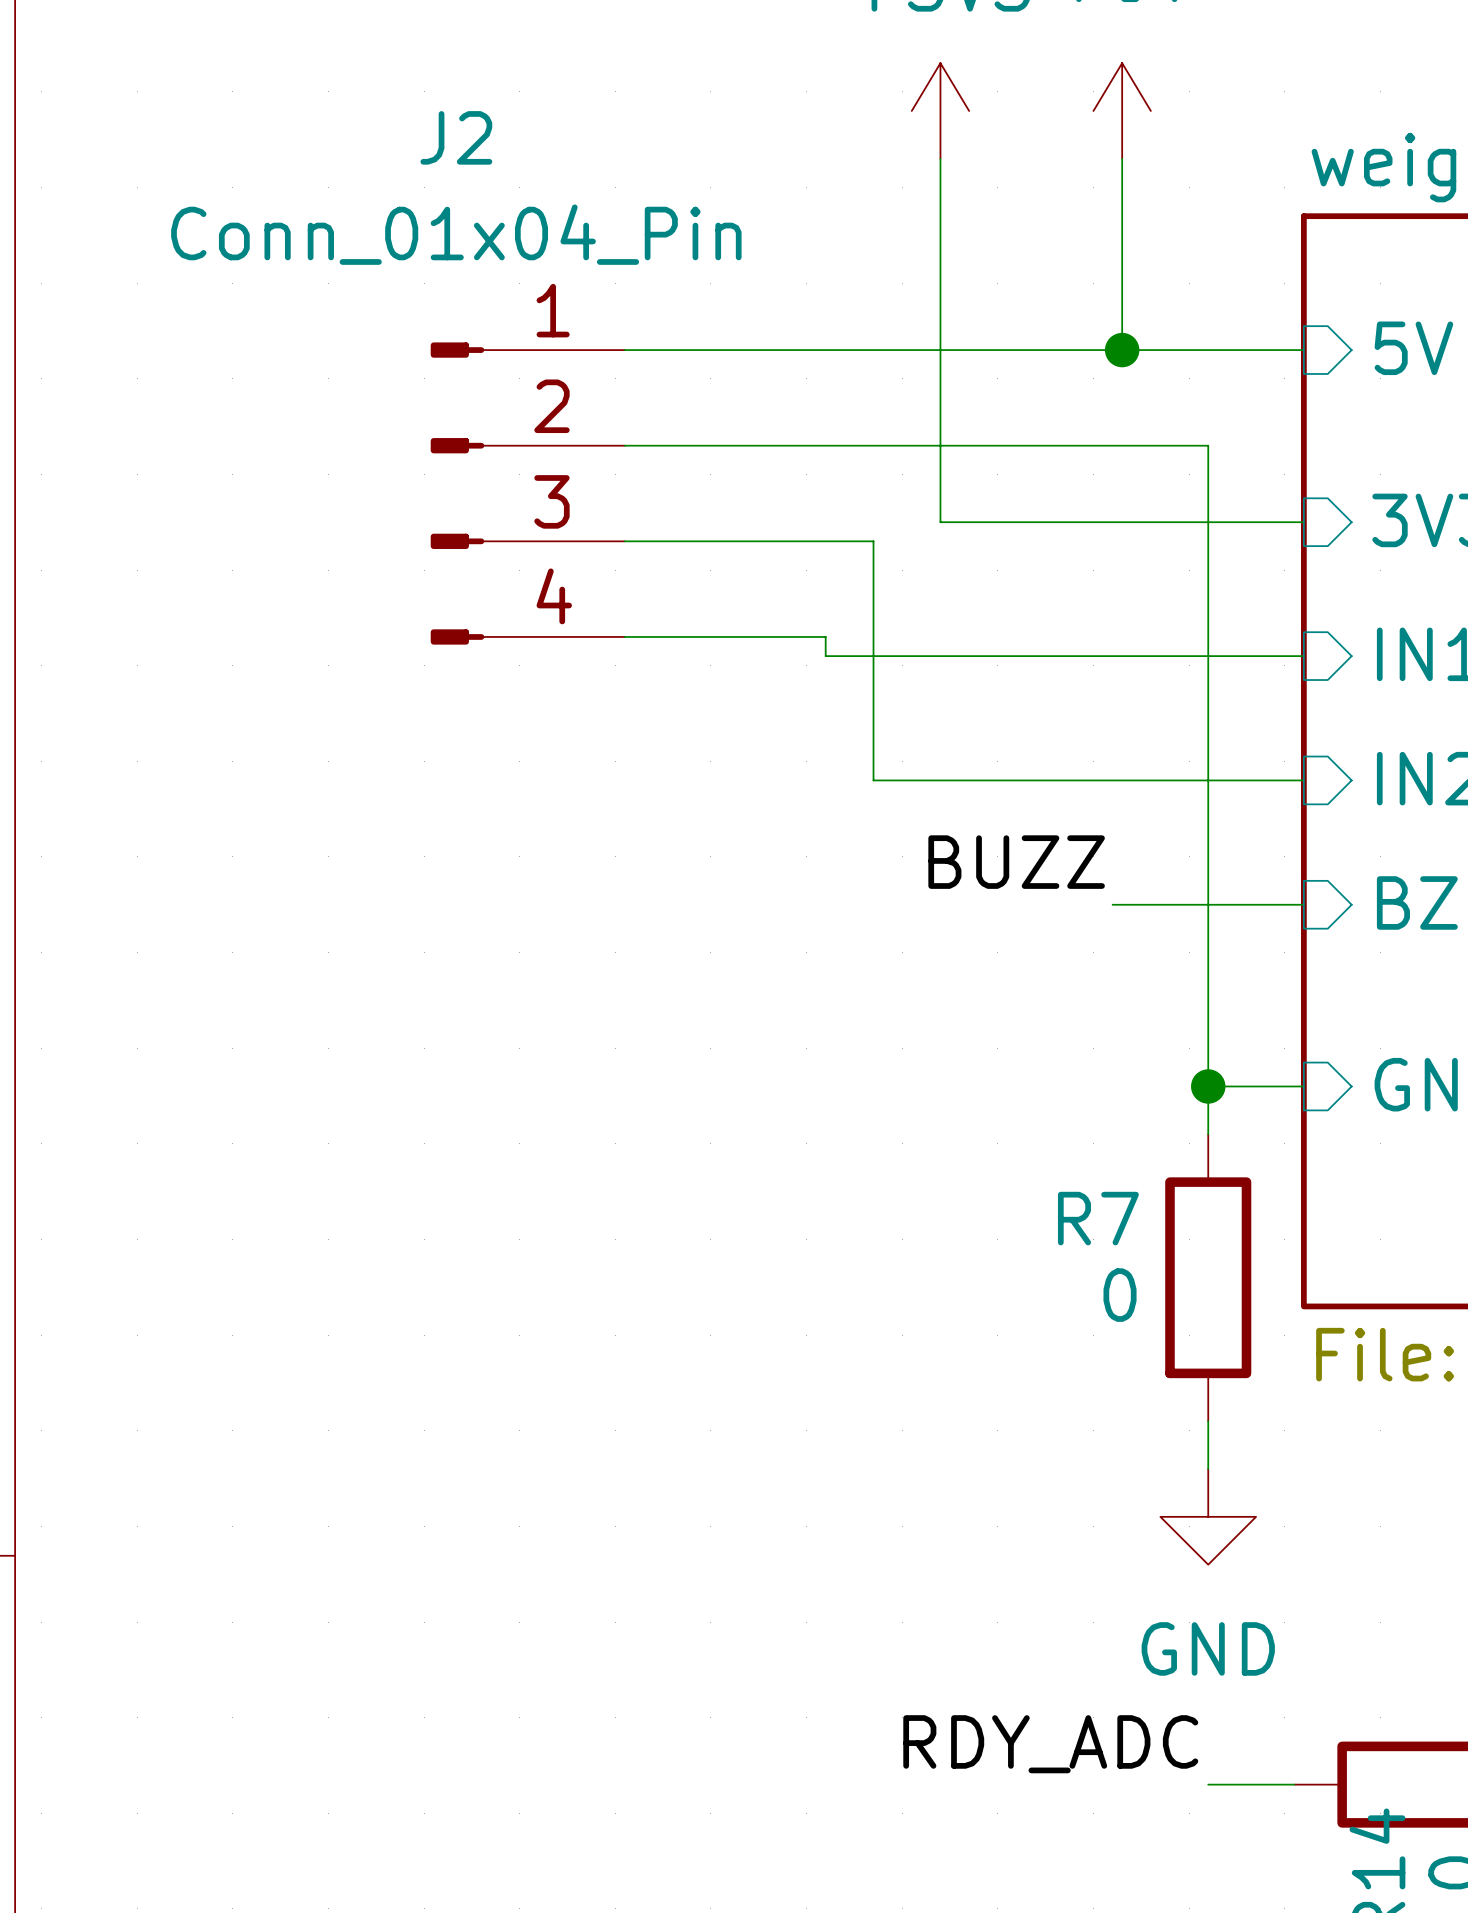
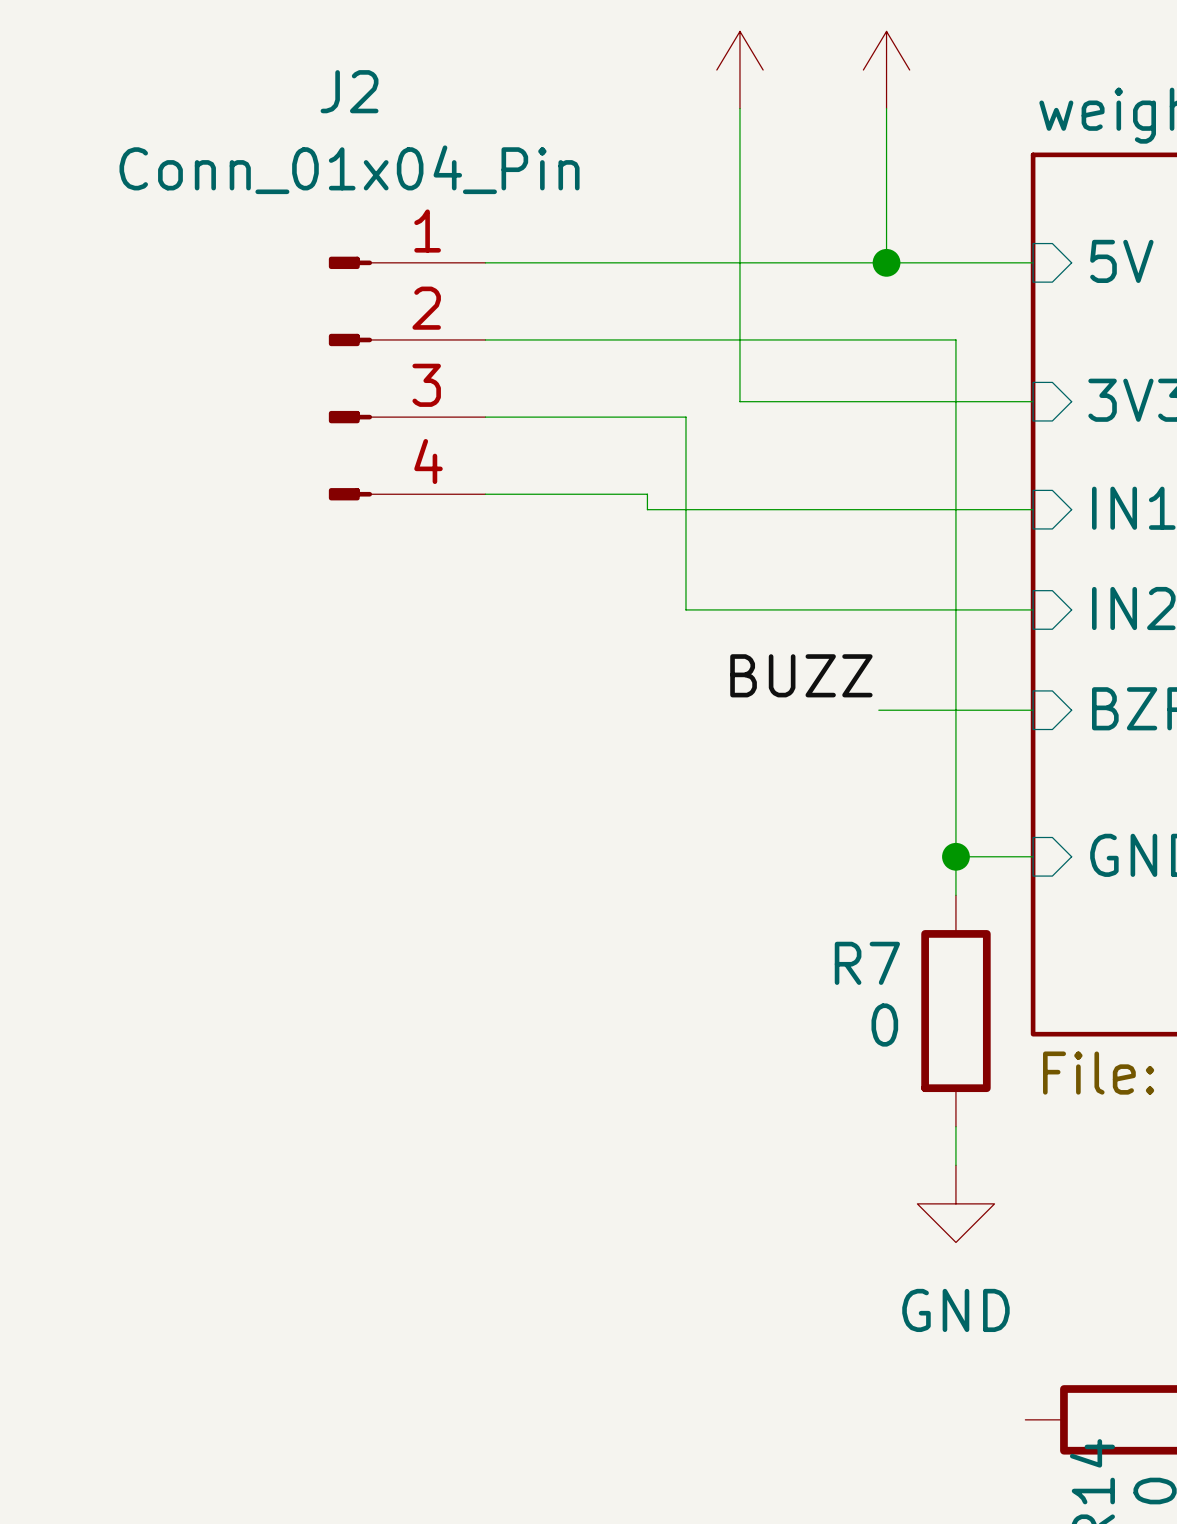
label: RDY_ADC (1050, 1744) -> none
wire: (1208, 1784) (1294, 1784) -> none

